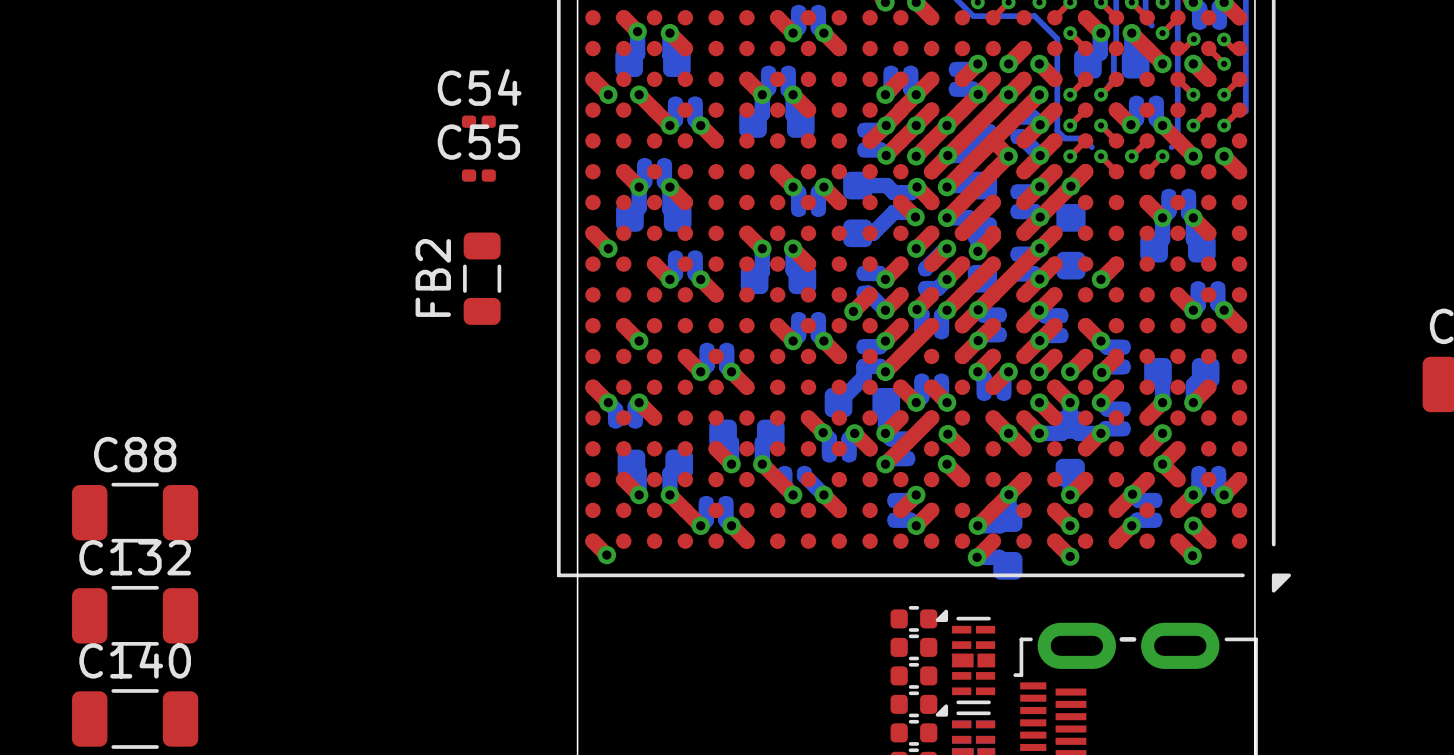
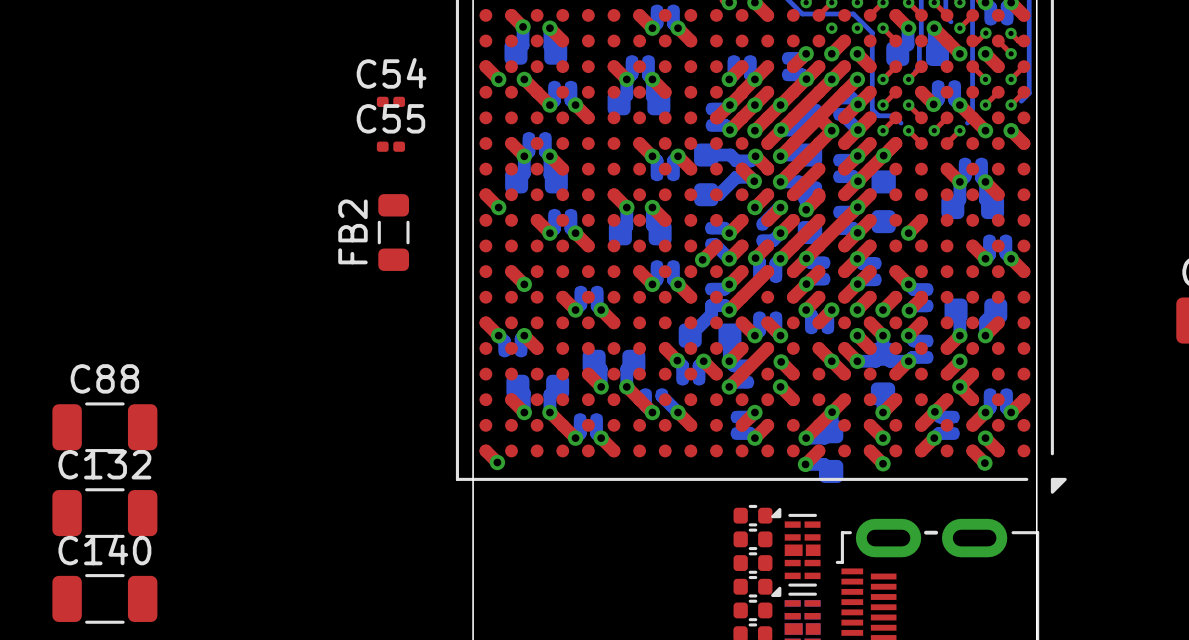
via: none -> (831, 28)
via: none -> (857, 28)
bottom track: none -> (1029, 93) (1021, 101)

